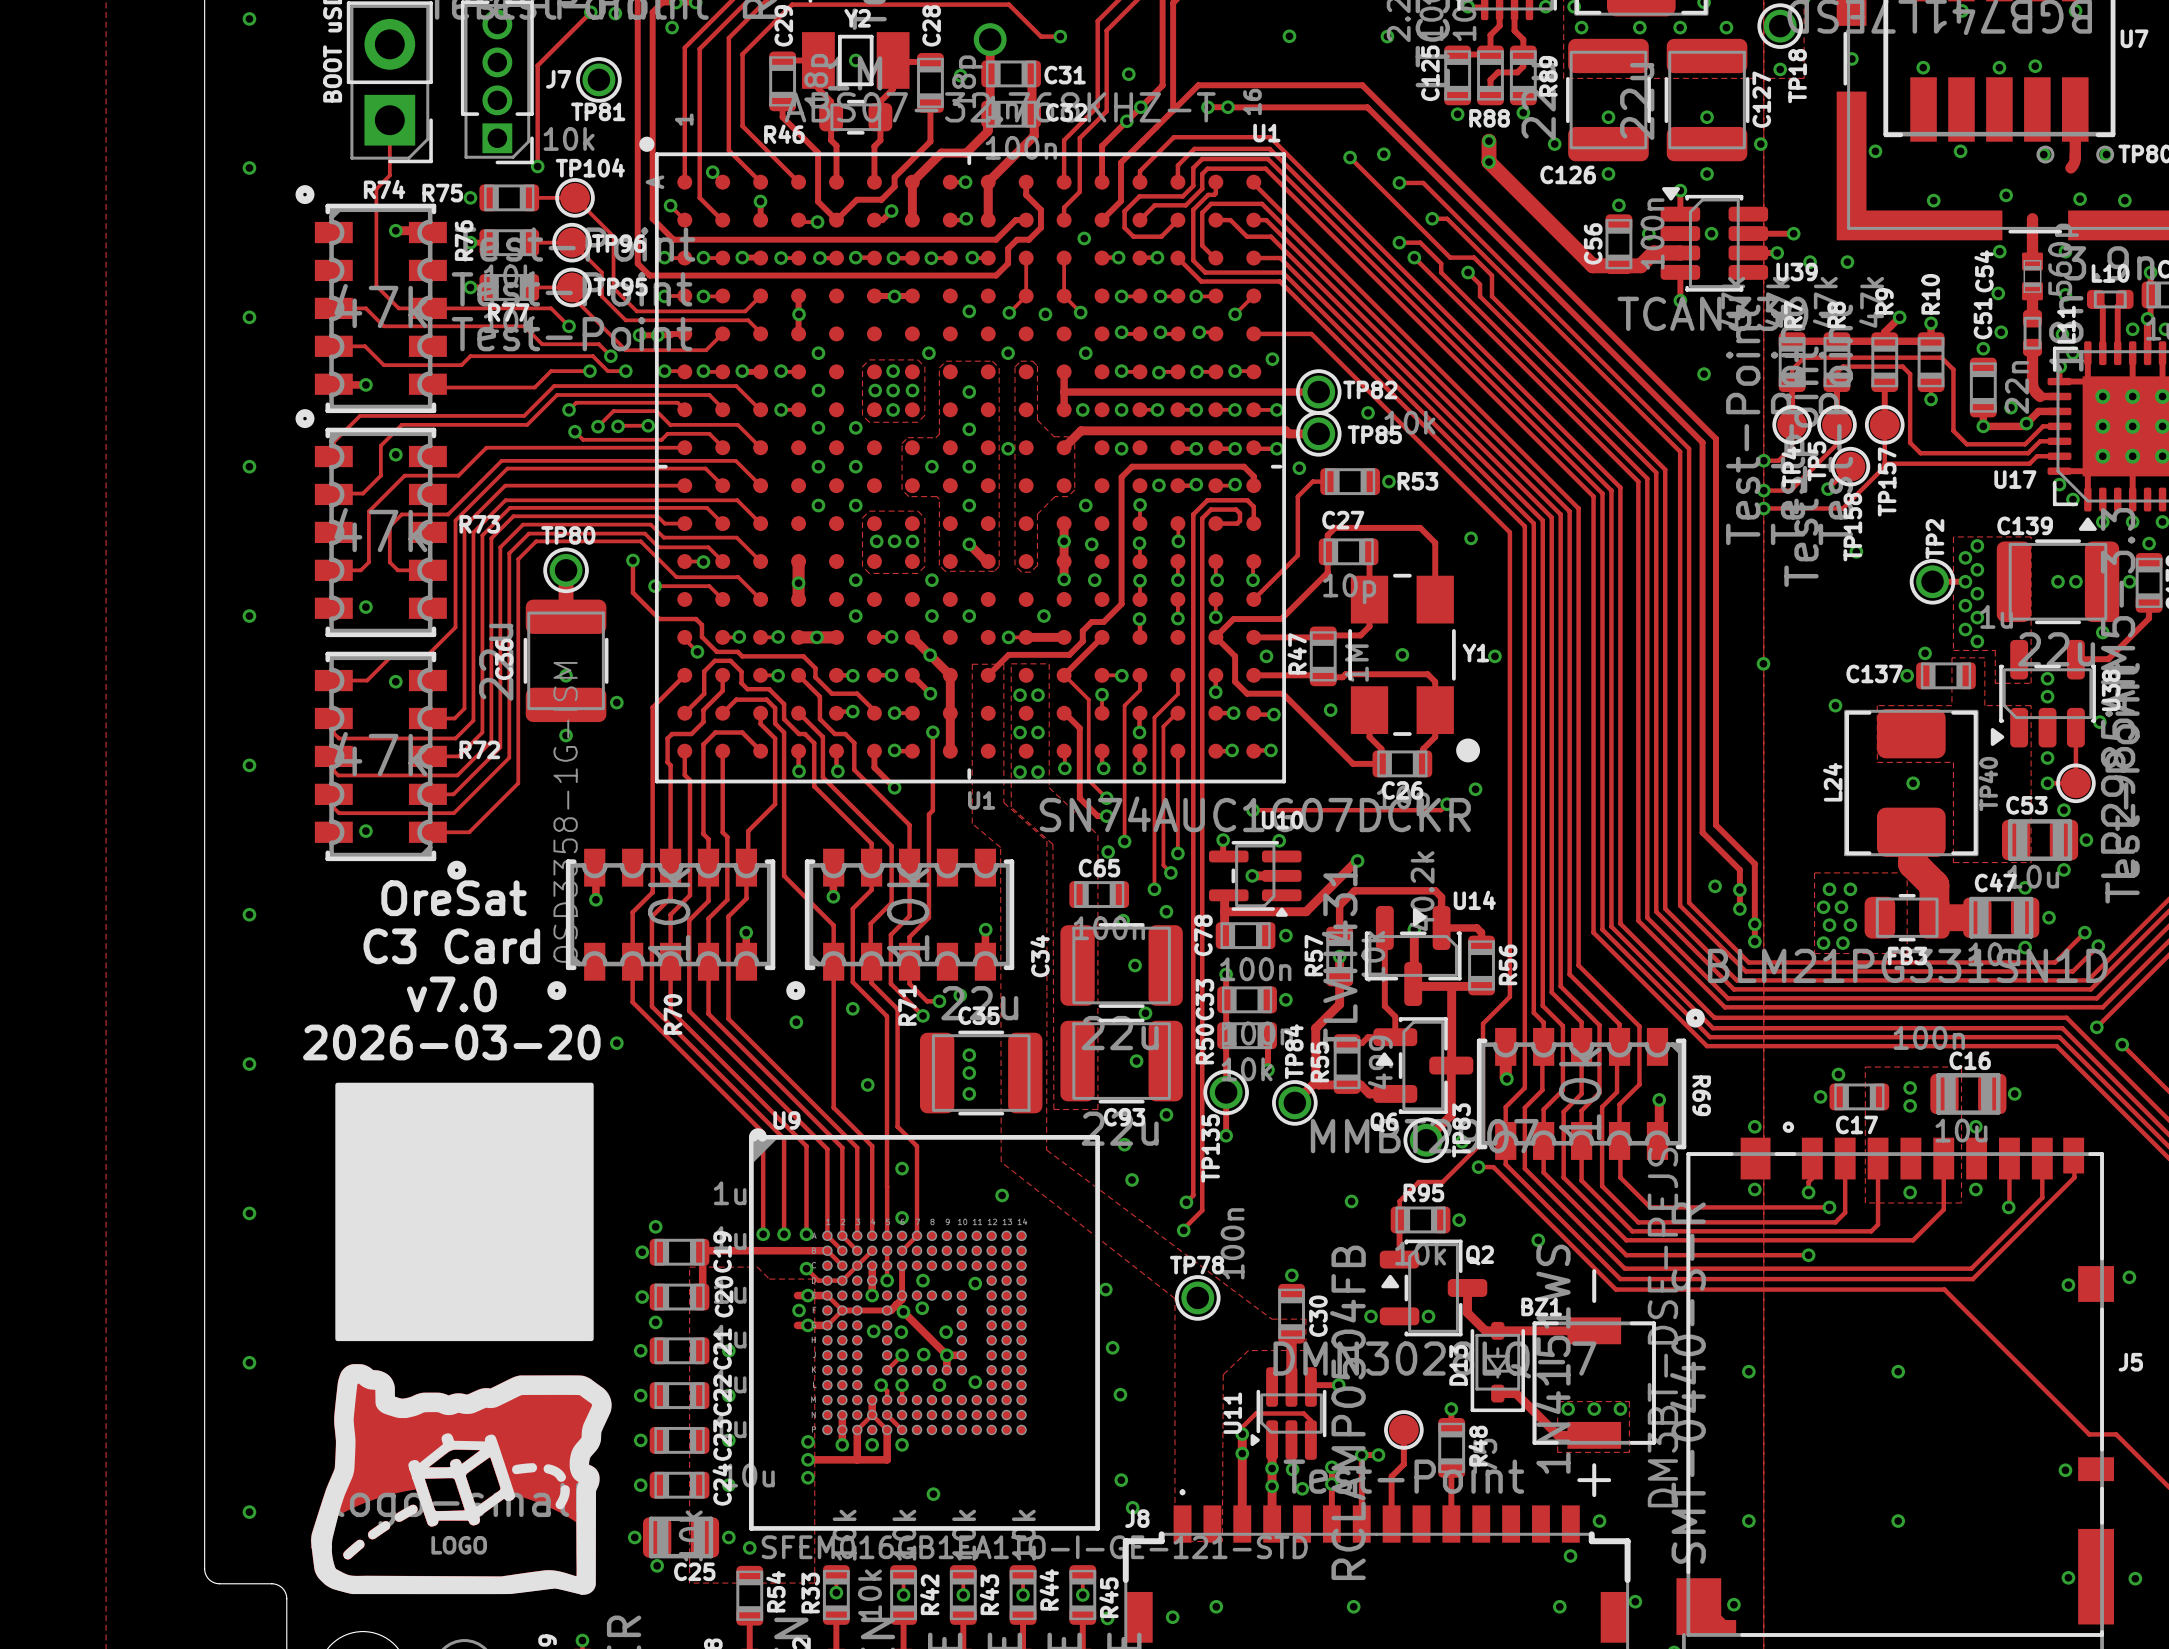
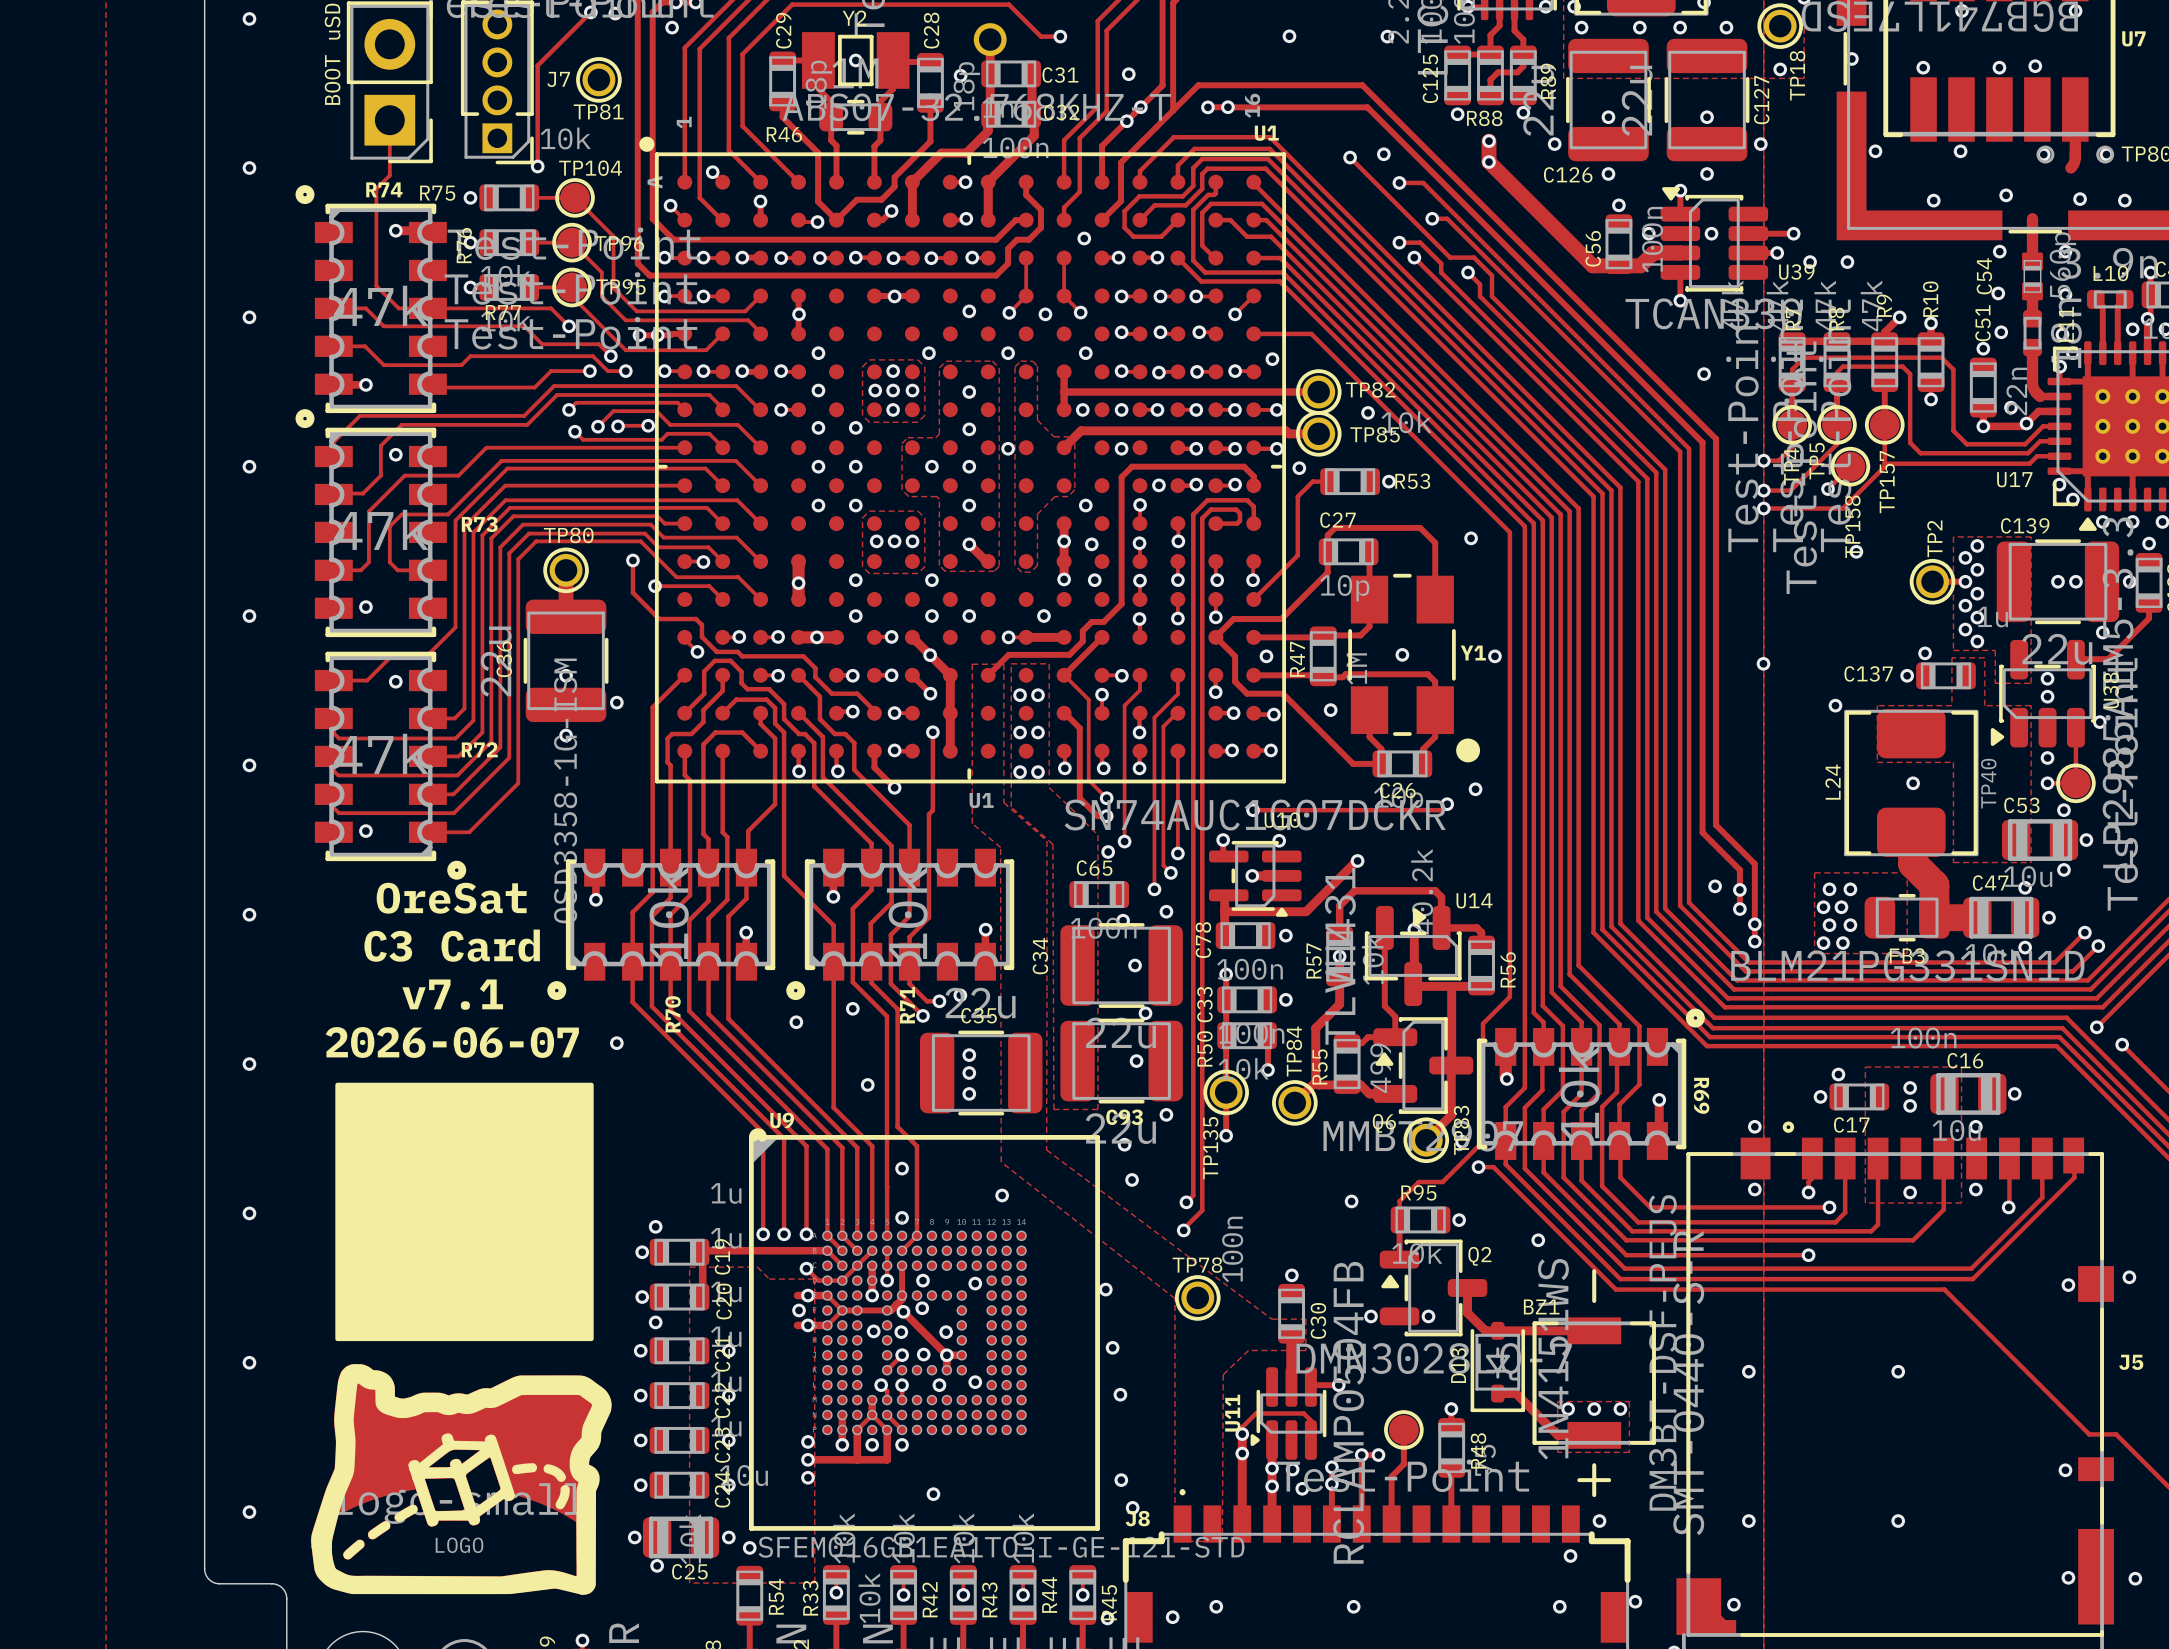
text: v7.0 (451, 994) -> v7.1 (452, 994)
text: 2026-03-20 (451, 1042) -> 2026-06-07 (452, 1042)

